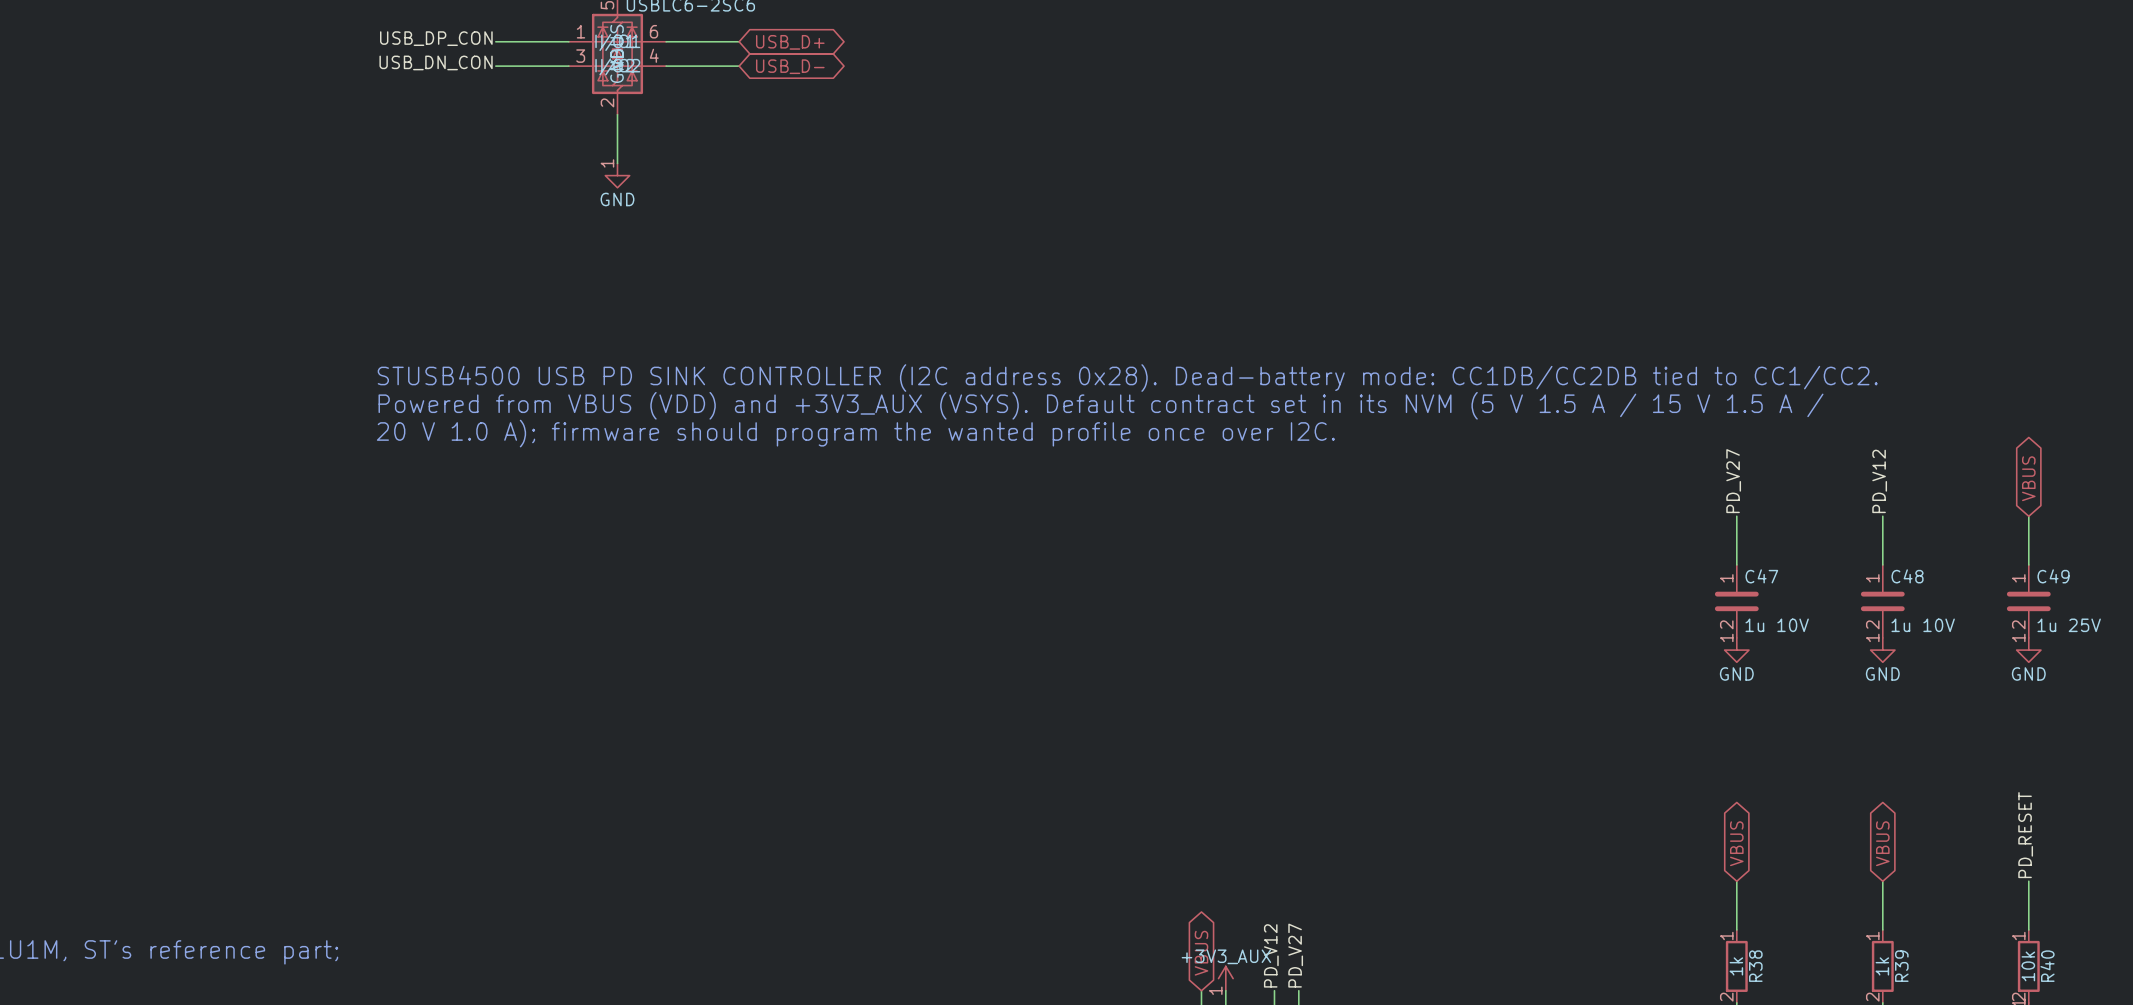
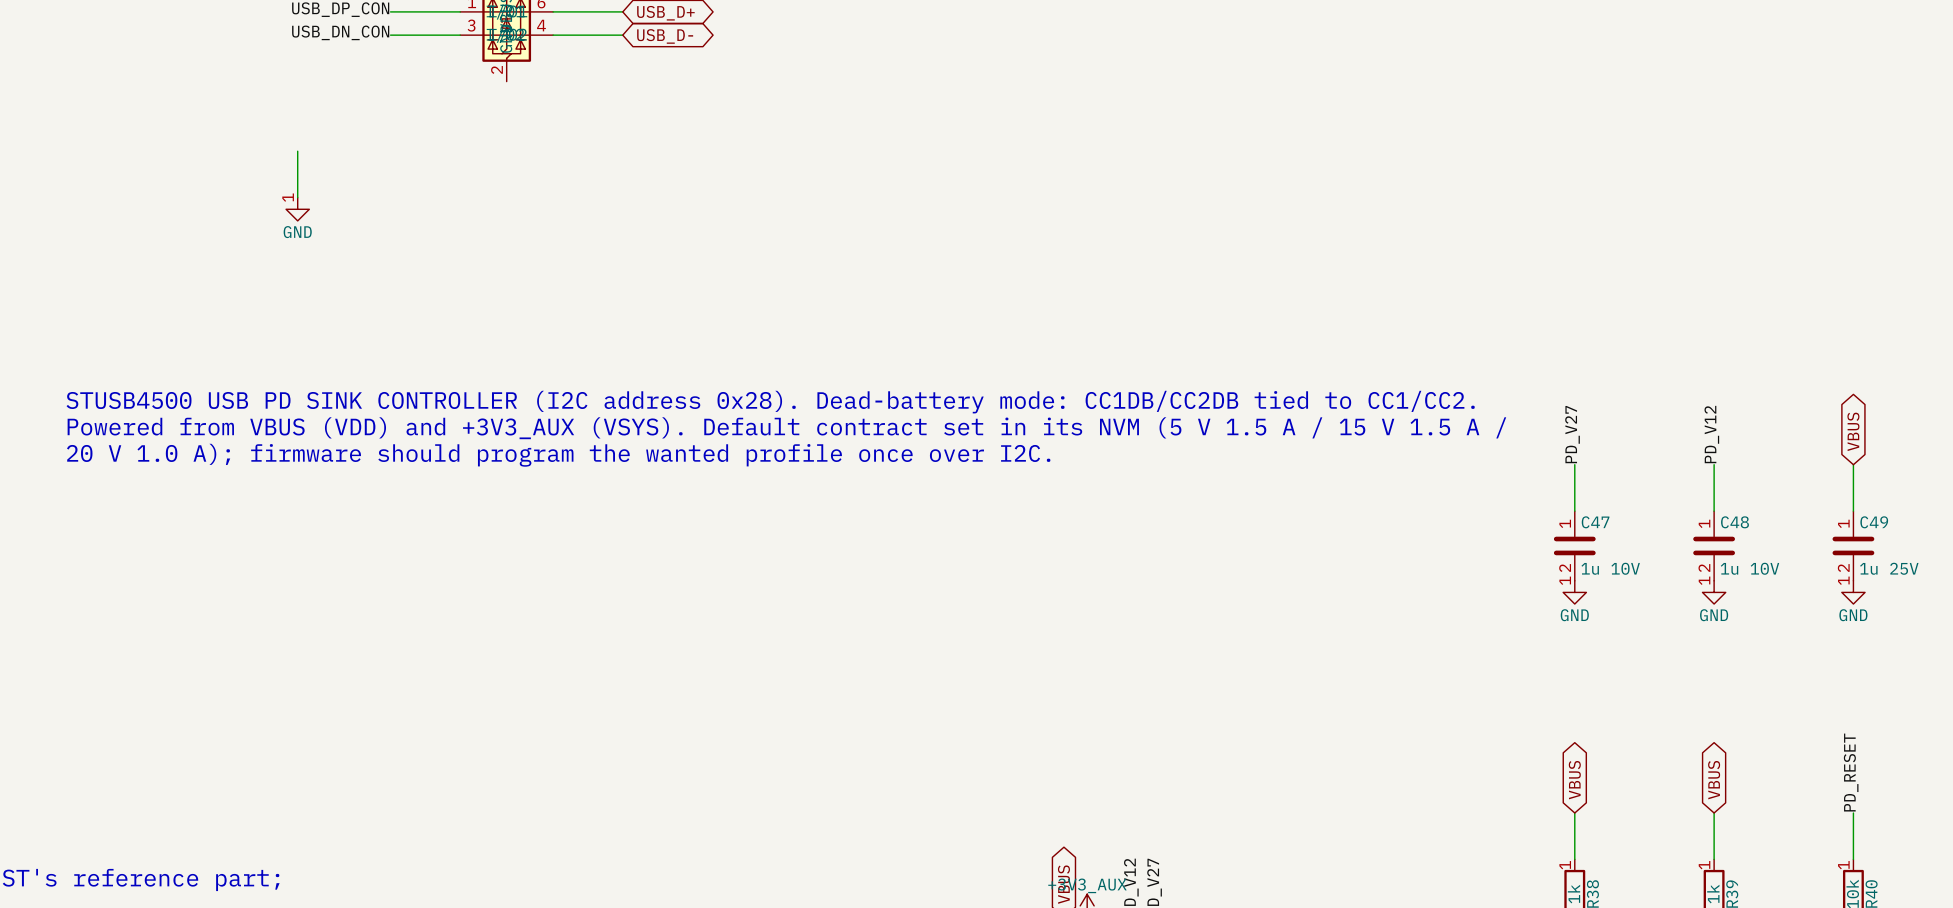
wire: (617, 114) (617, 163) -> (297, 151) (297, 197)
power symbol position: GND (617, 175) -> GND (297, 209)
text position: STUSB4500 USB PD SINK CONTROLLER (I2C address 0x28). Dead-battery mode: CC1DB/CC2DB tied to CC1/CC2. (1127, 378) -> STUSB4500 USB PD SINK CONTROLLER (I2C address 0x28). Dead-battery mode: CC1DB/CC2DB tied to CC1/CC2. (770, 402)
text position: Powered from VBUS (VDD) and +3V3_AUX (VSYS). Default contract set in its NVM (5 V 1.5 A / 15 V 1.5 A / (1101, 405) -> Powered from VBUS (VDD) and +3V3_AUX (VSYS). Default contract set in its NVM (5 V 1.5 A / 15 V 1.5 A / (786, 428)
text position: 20 V 1.0 A); firmware should program the wanted profile once over I2C. (855, 433) -> 20 V 1.0 A); firmware should program the wanted profile once over I2C. (558, 455)

